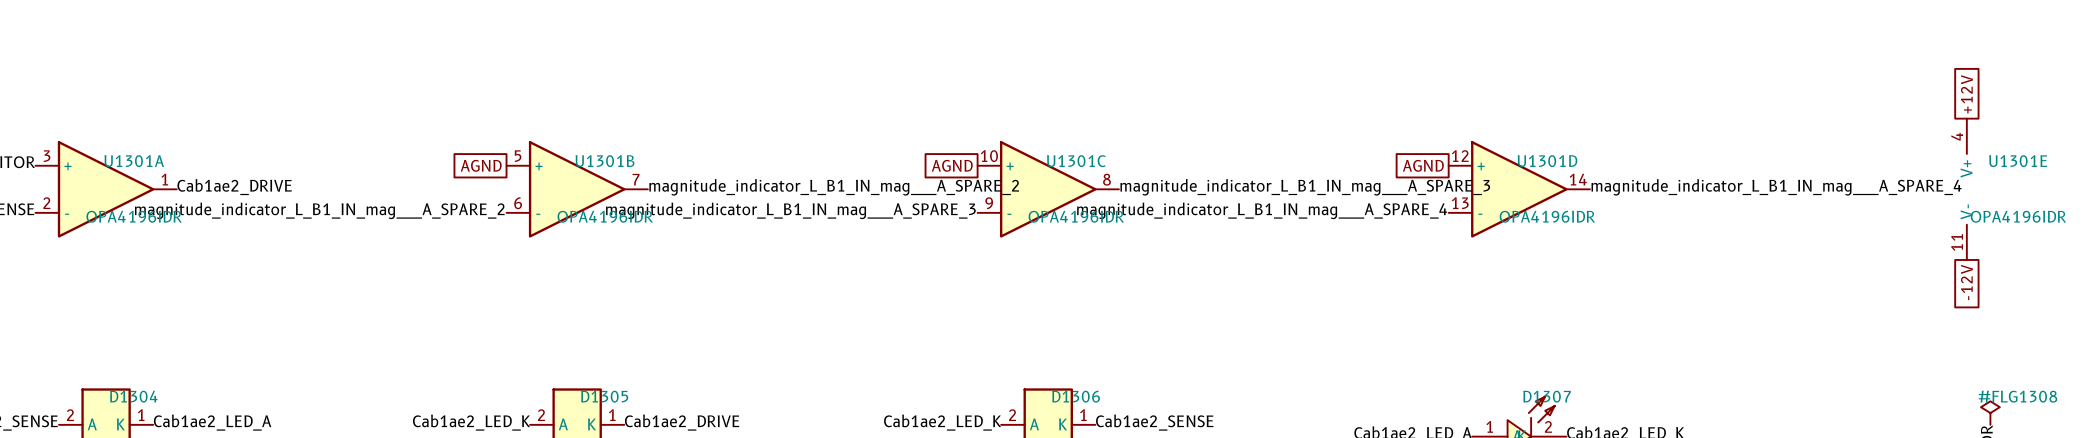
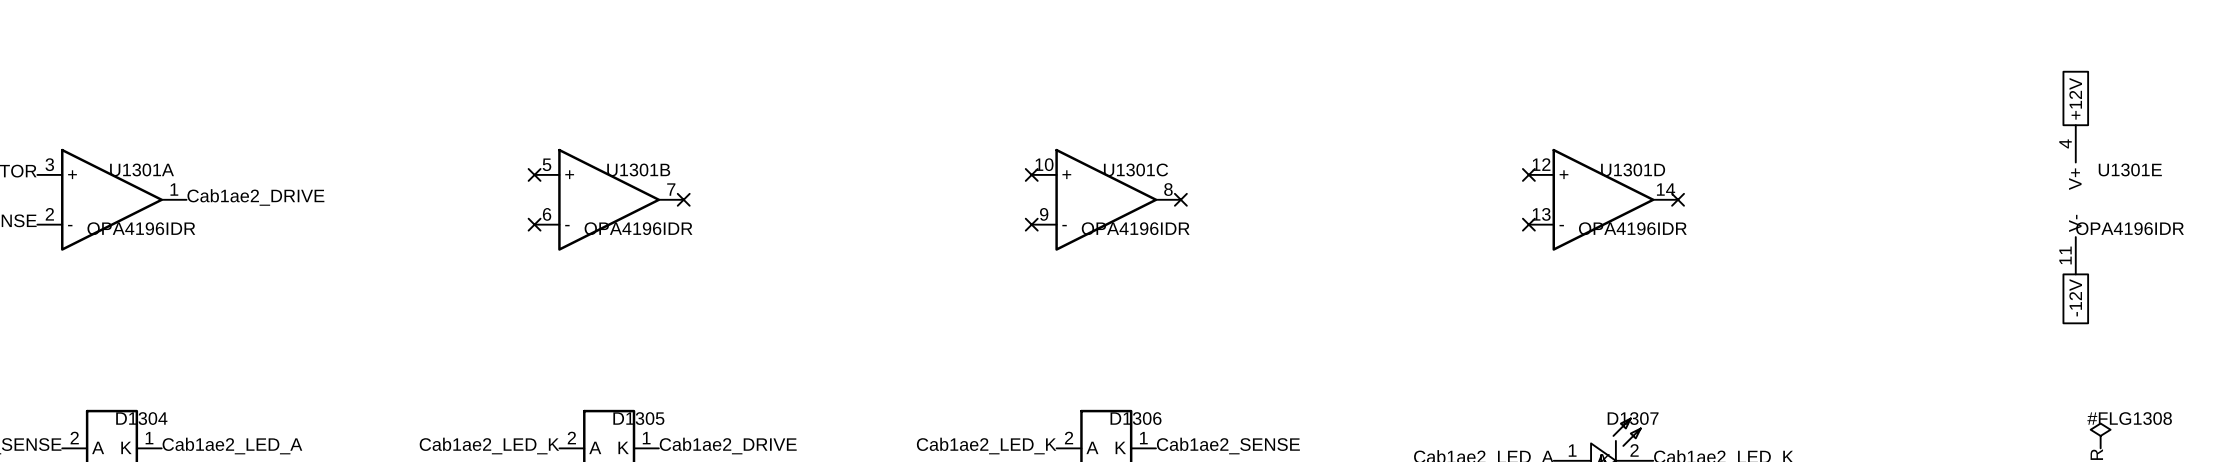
global label: AGND (481, 165) -> none
no-connect mark: none -> (534, 174)
global label: AGND (952, 165) -> none
no-connect mark: none -> (1031, 174)
global label: AGND (1423, 165) -> none
no-connect mark: none -> (1528, 174)
label: magnitude_indicator_L_B1_IN_mag___A_SPARE_2 (834, 187) -> none
label: magnitude_indicator_L_B1_IN_mag___A_SPARE_3 (1305, 187) -> none
label: magnitude_indicator_L_B1_IN_mag___A_SPARE_4 (1776, 187) -> none
no-connect mark: none -> (683, 199)
no-connect mark: none -> (1180, 199)
no-connect mark: none -> (1678, 199)
label: magnitude_indicator_L_B1_IN_mag___A_SPARE_2 (319, 210) -> none
label: magnitude_indicator_L_B1_IN_mag___A_SPARE_3 (790, 210) -> none
label: magnitude_indicator_L_B1_IN_mag___A_SPARE_4 (1262, 210) -> none
no-connect mark: none -> (534, 224)
no-connect mark: none -> (1031, 224)
no-connect mark: none -> (1528, 224)

